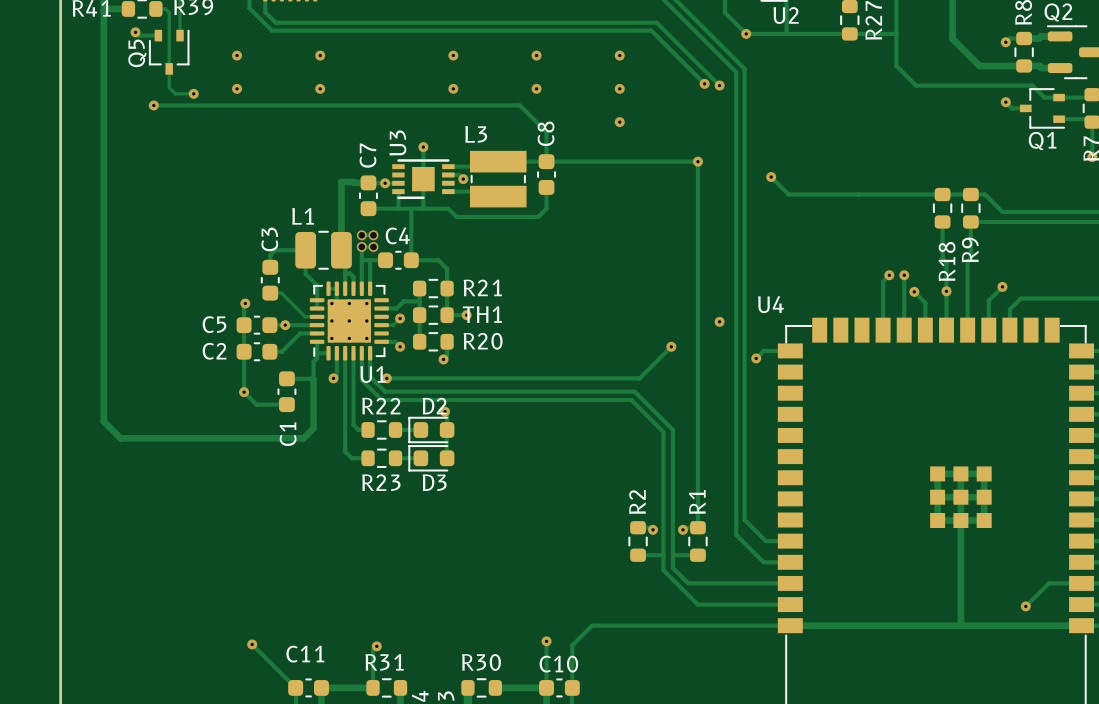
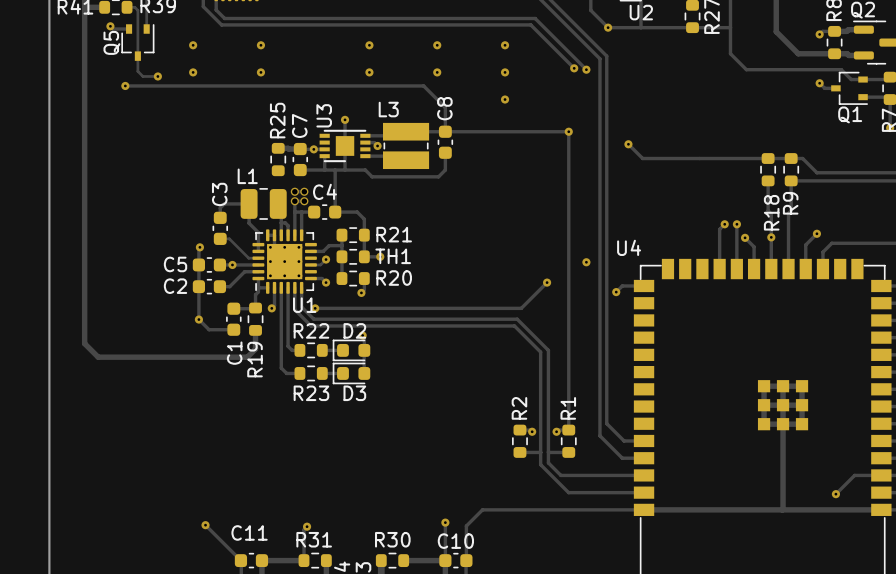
track: (341, 182) (341, 250) -> none
R25: none -> (278, 159)
track: (312, 378) (313, 405) -> none
R19: none -> (255, 319)

